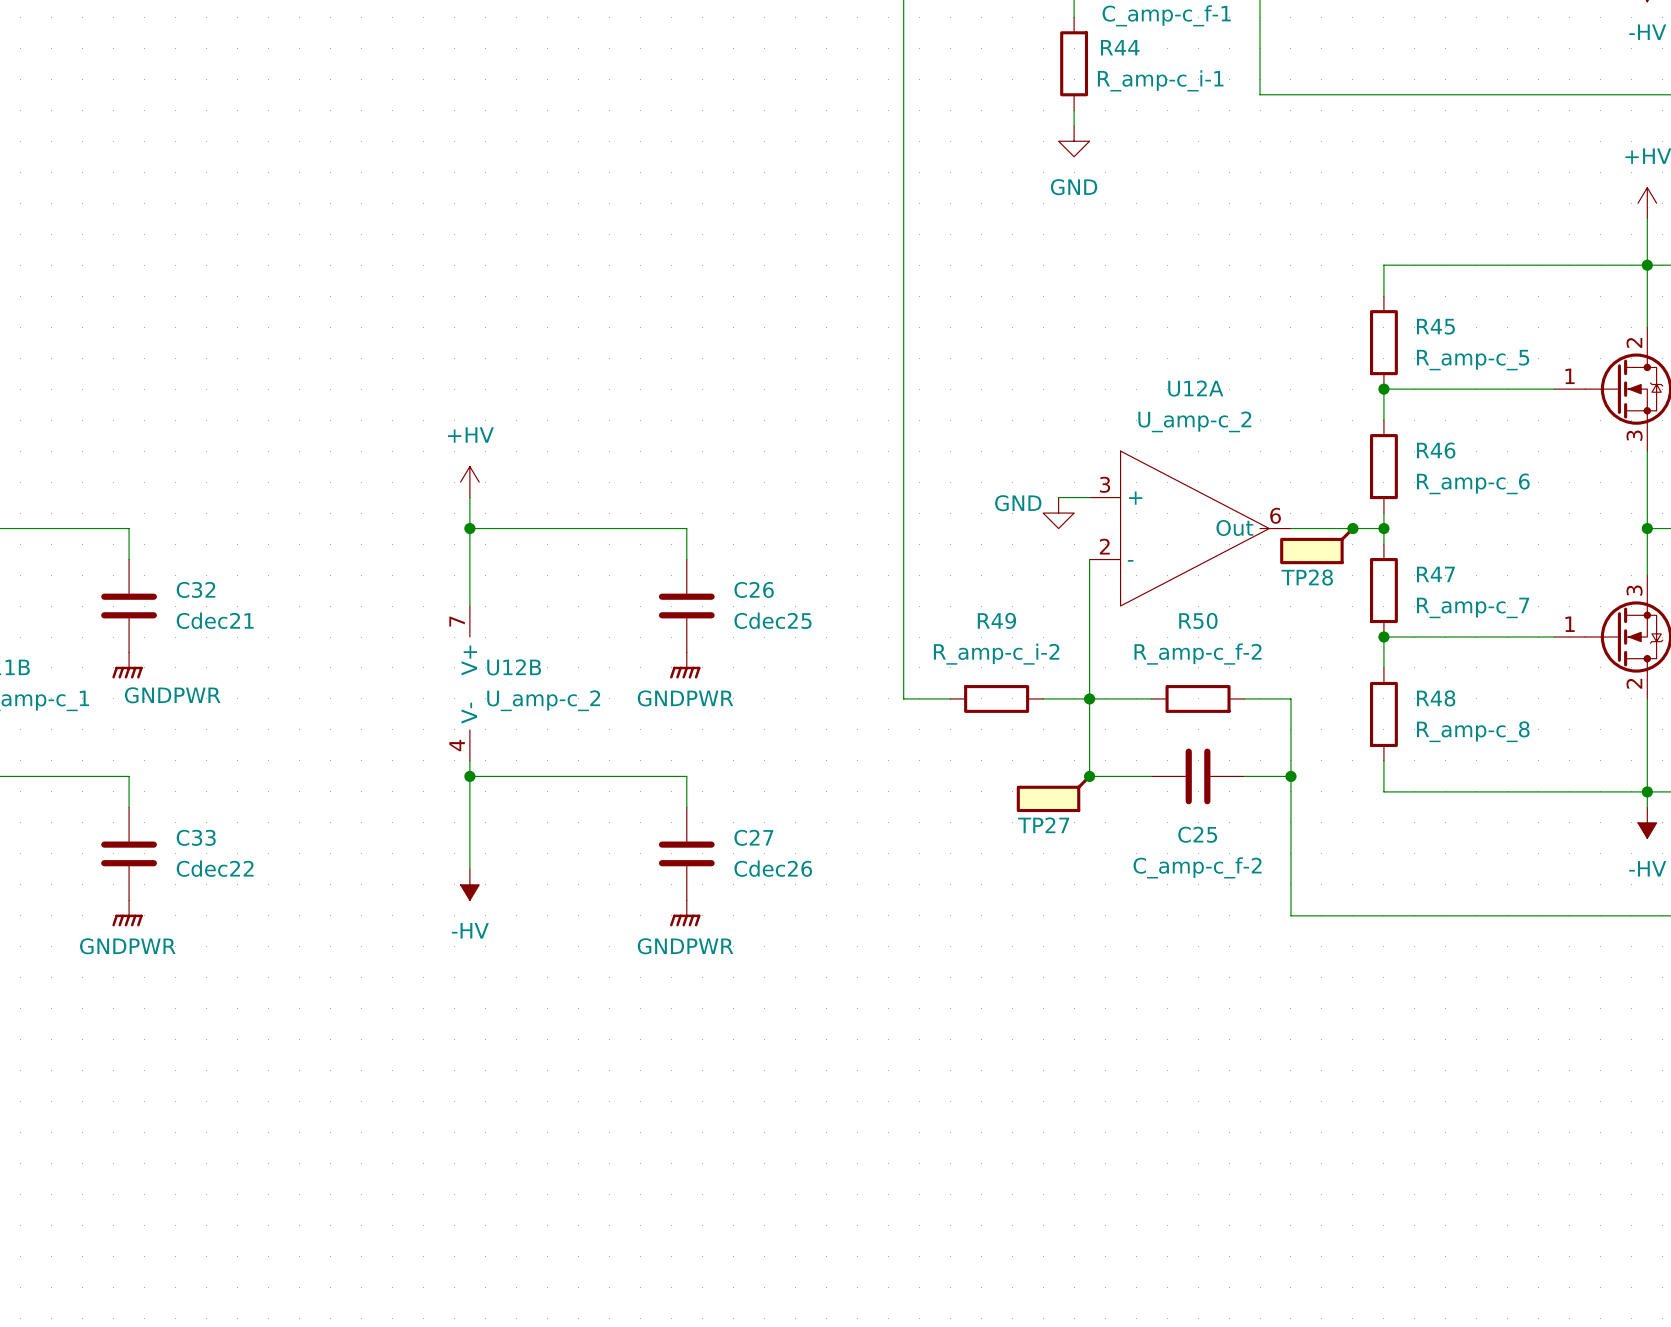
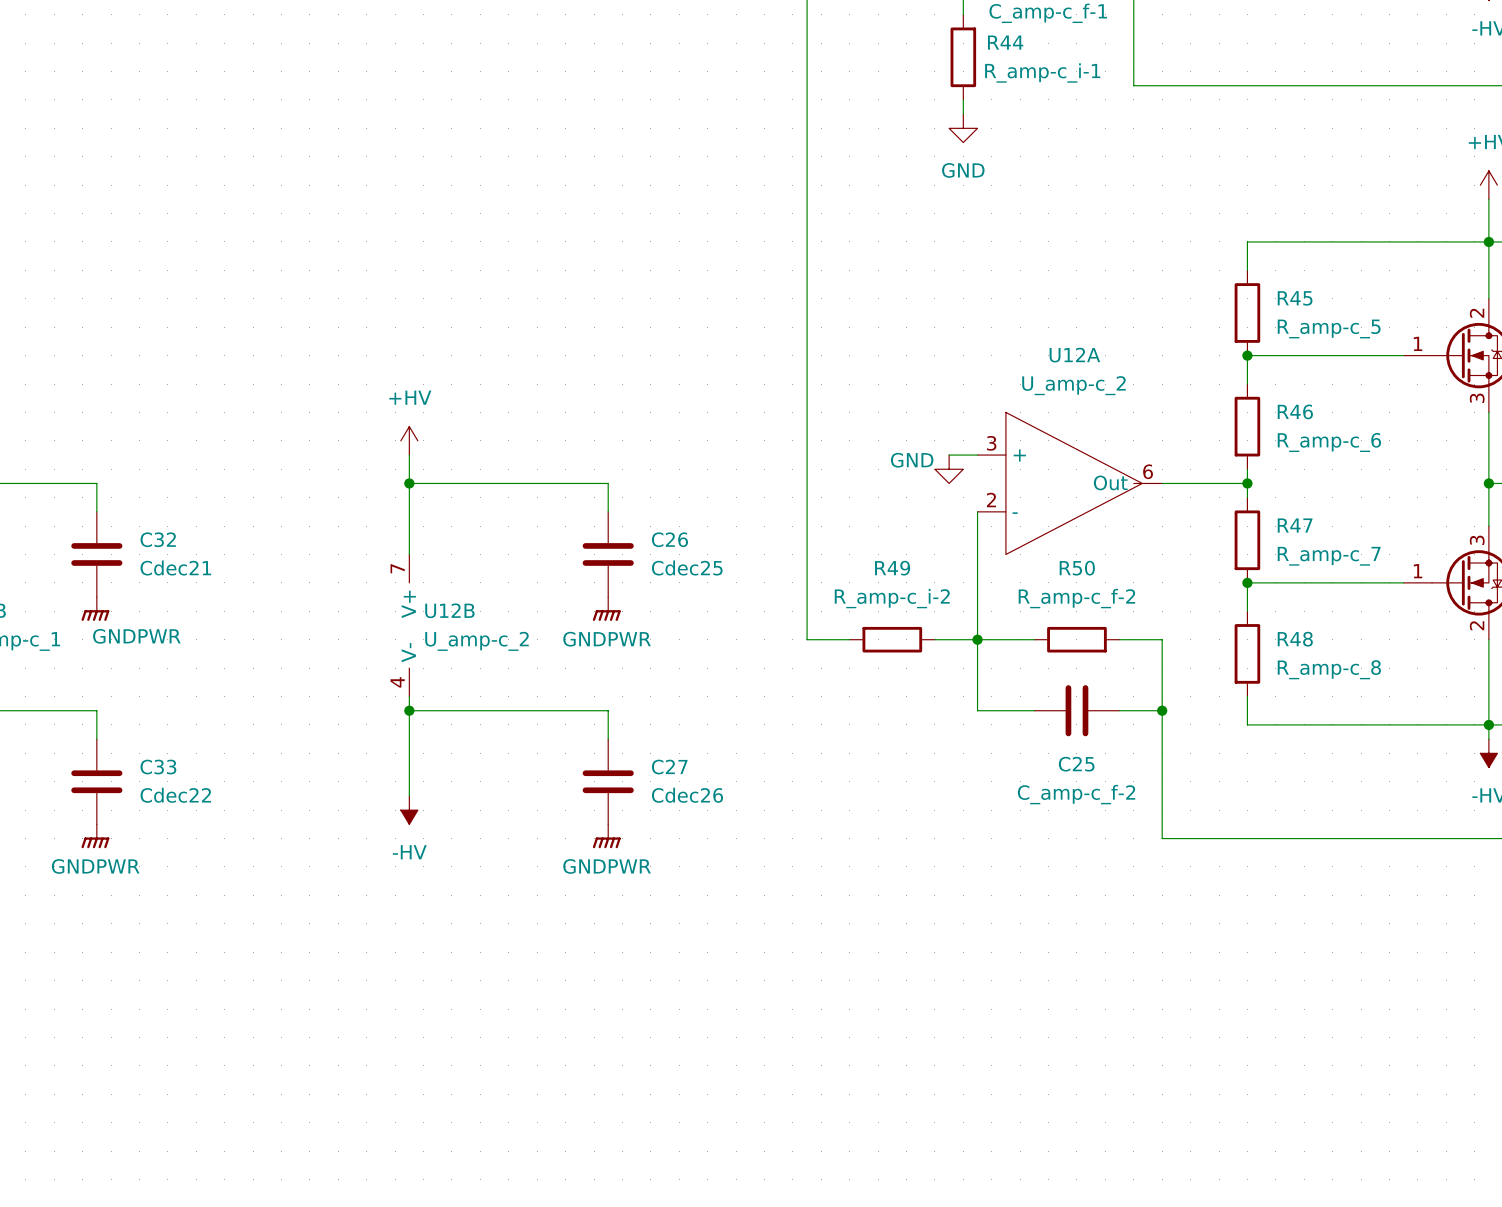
junction: (1352, 528) -> none
TP28: (1317, 545) -> none
junction: (1089, 776) -> none
TP27: (1053, 793) -> none

